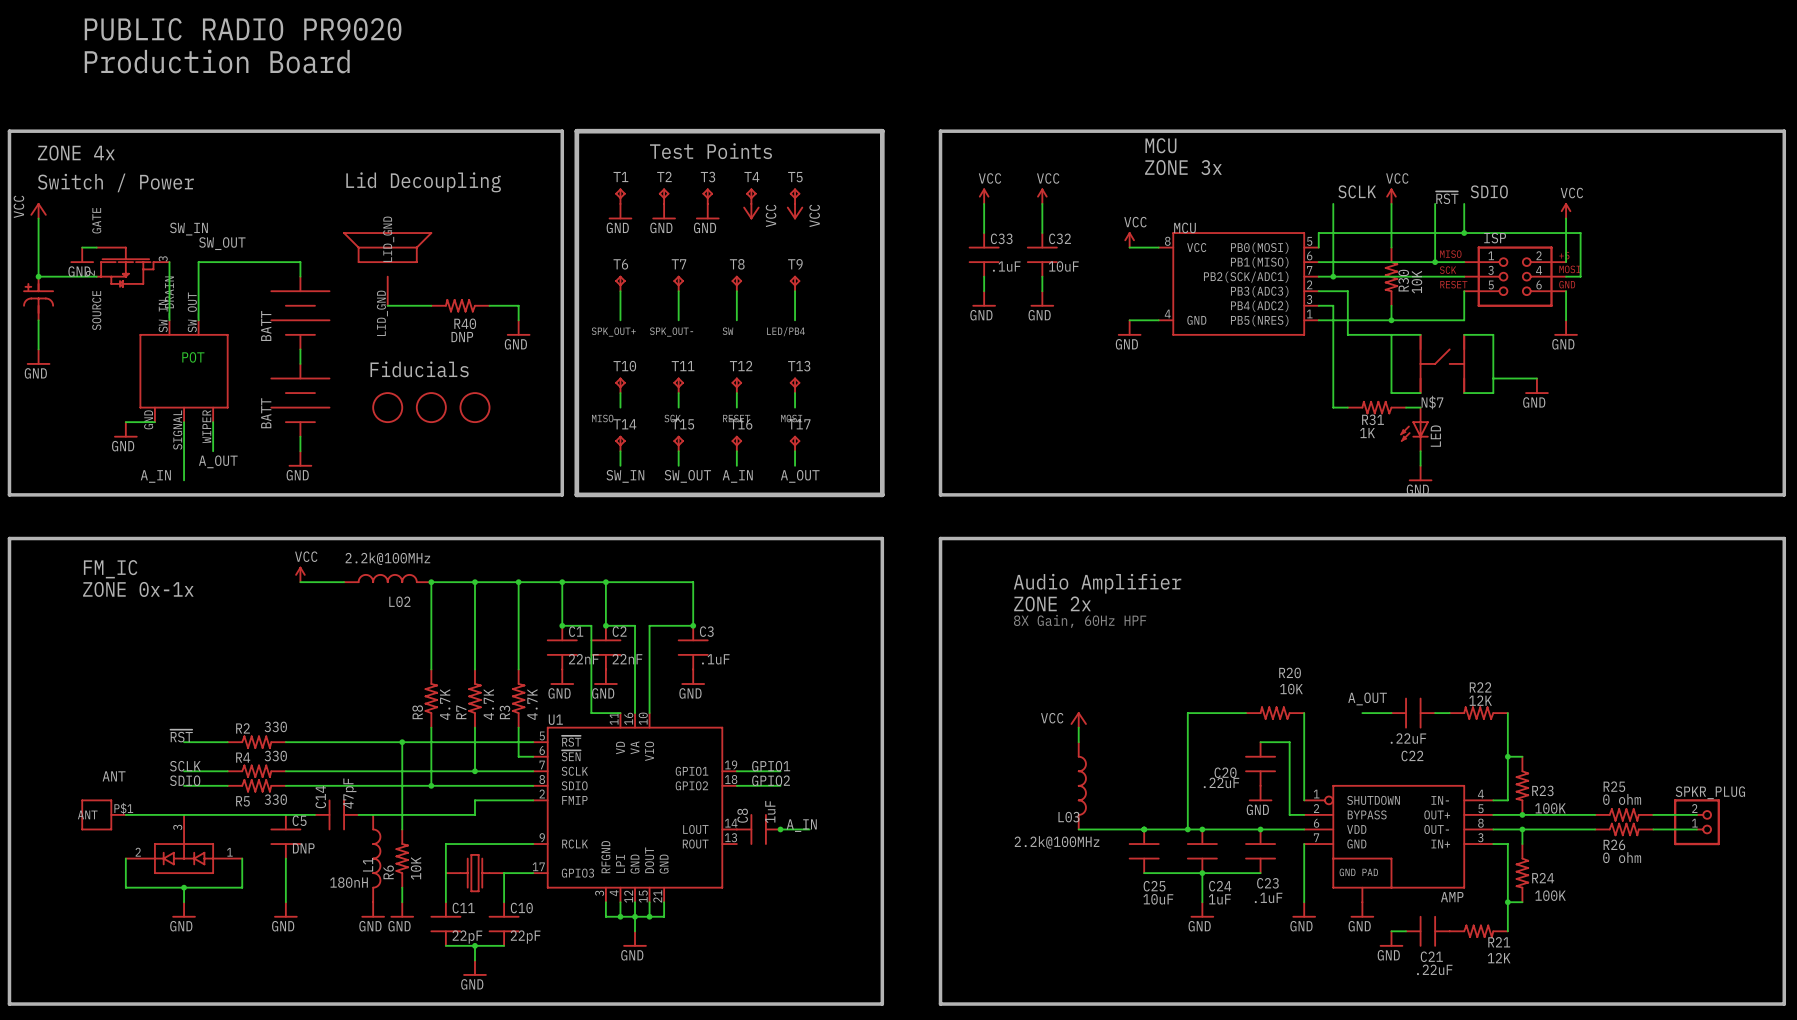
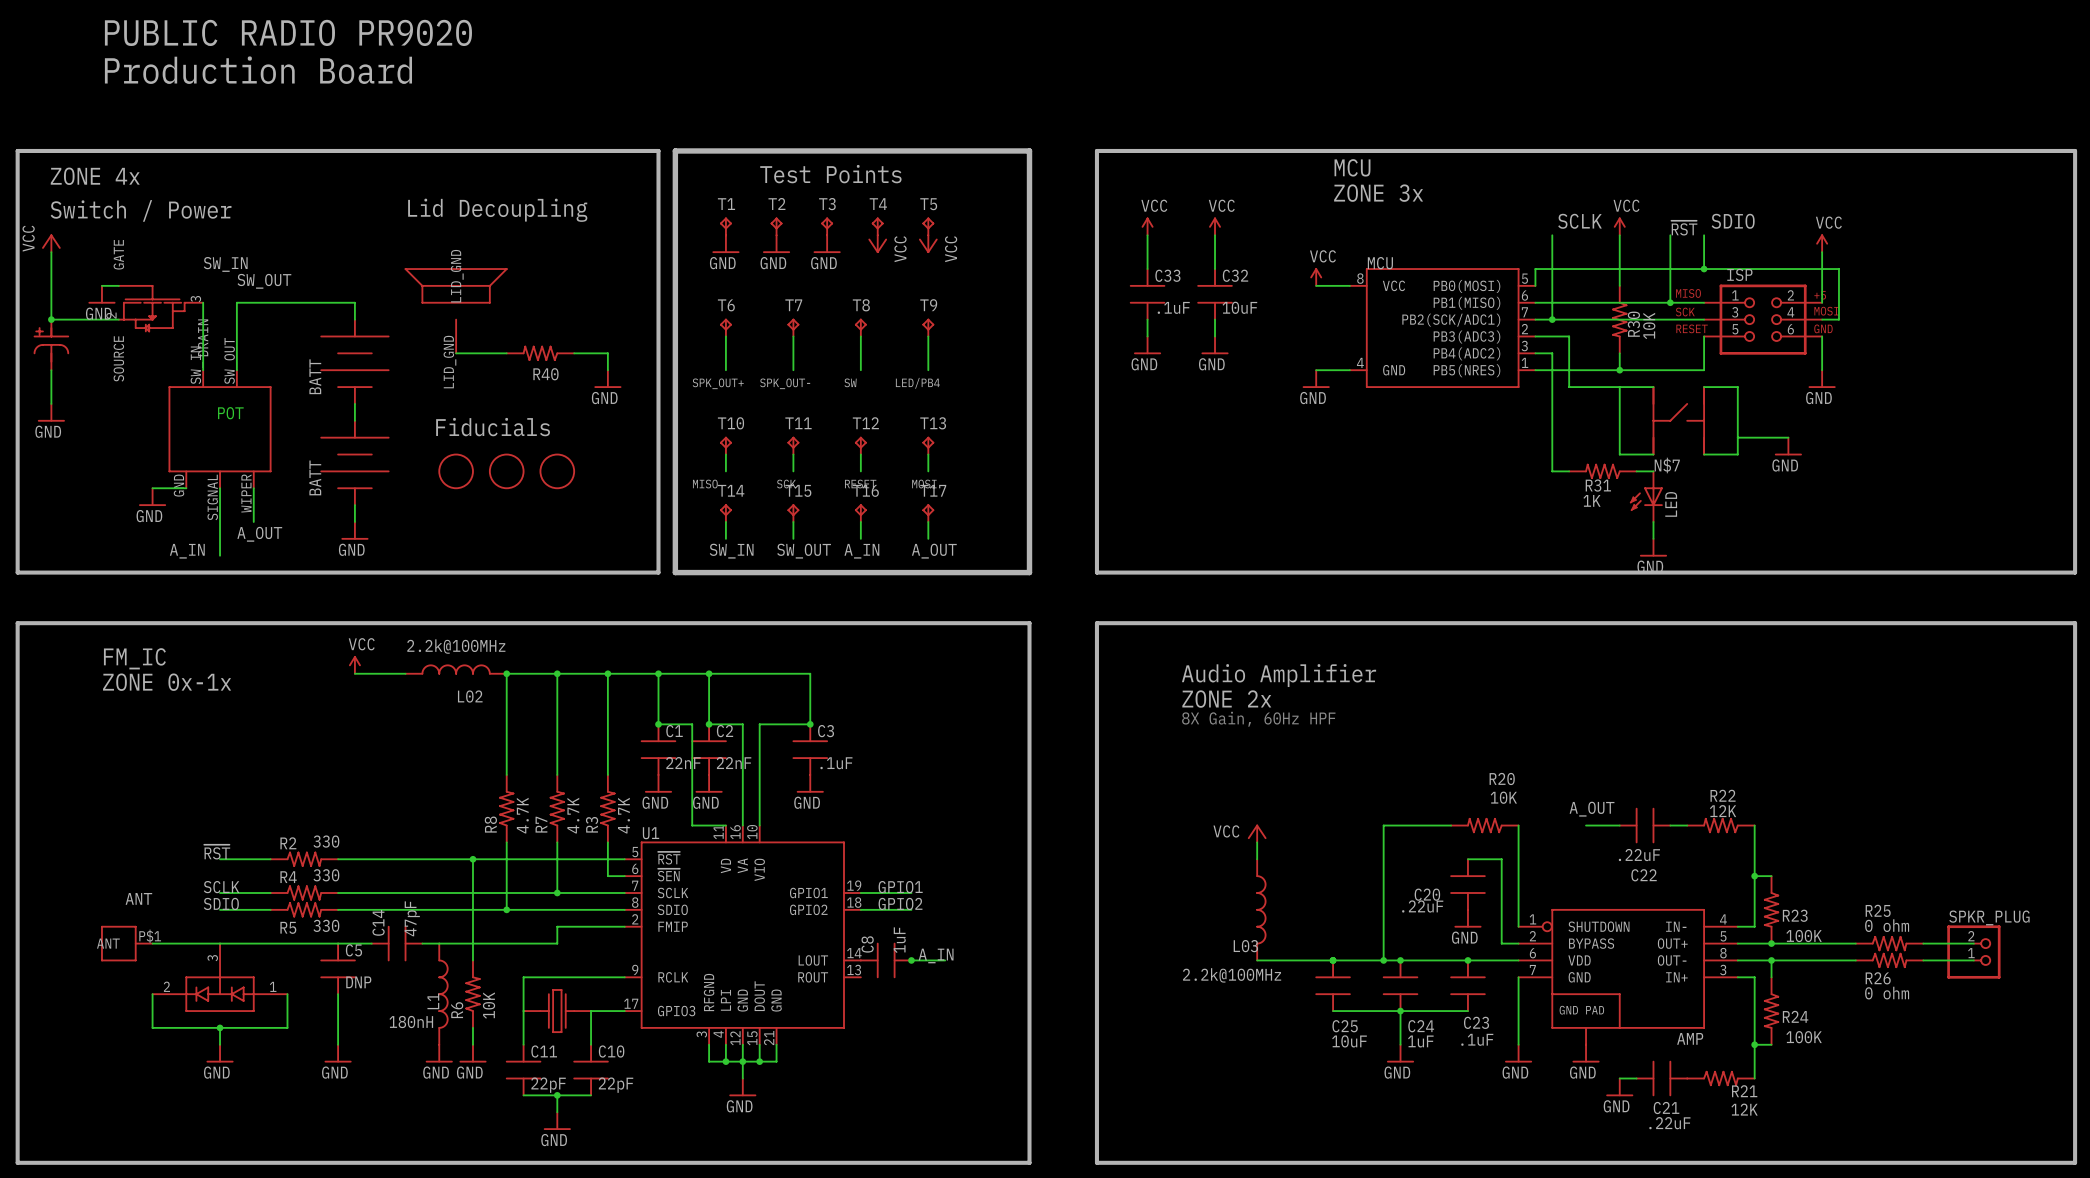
R40 value: DNP (462, 337) -> none

